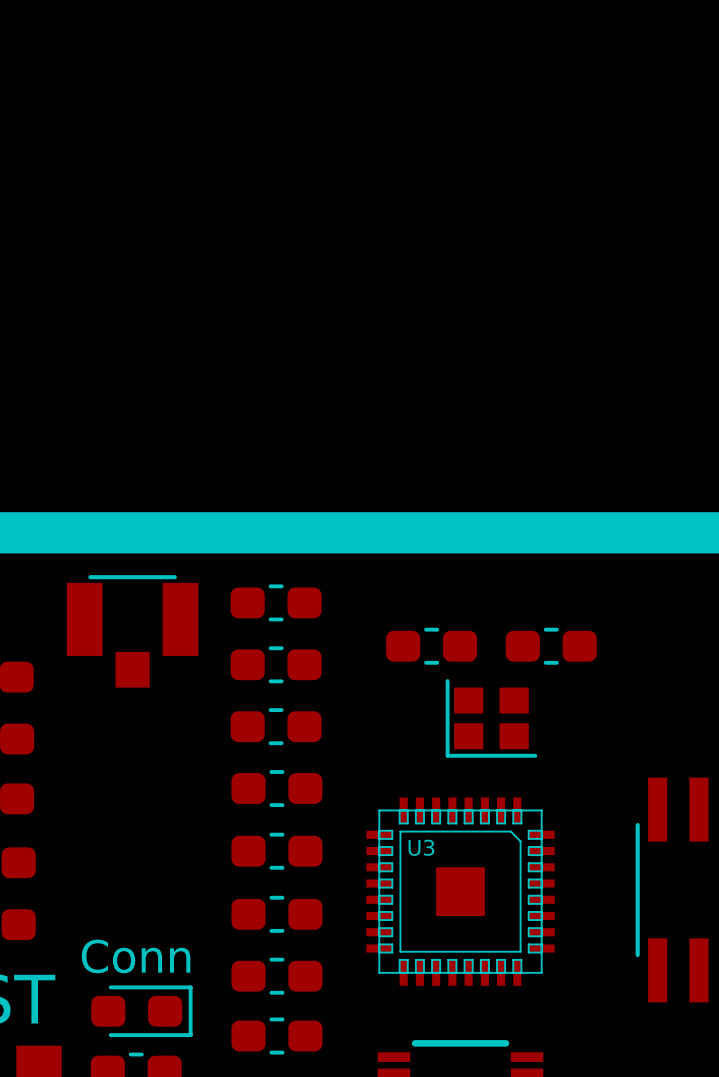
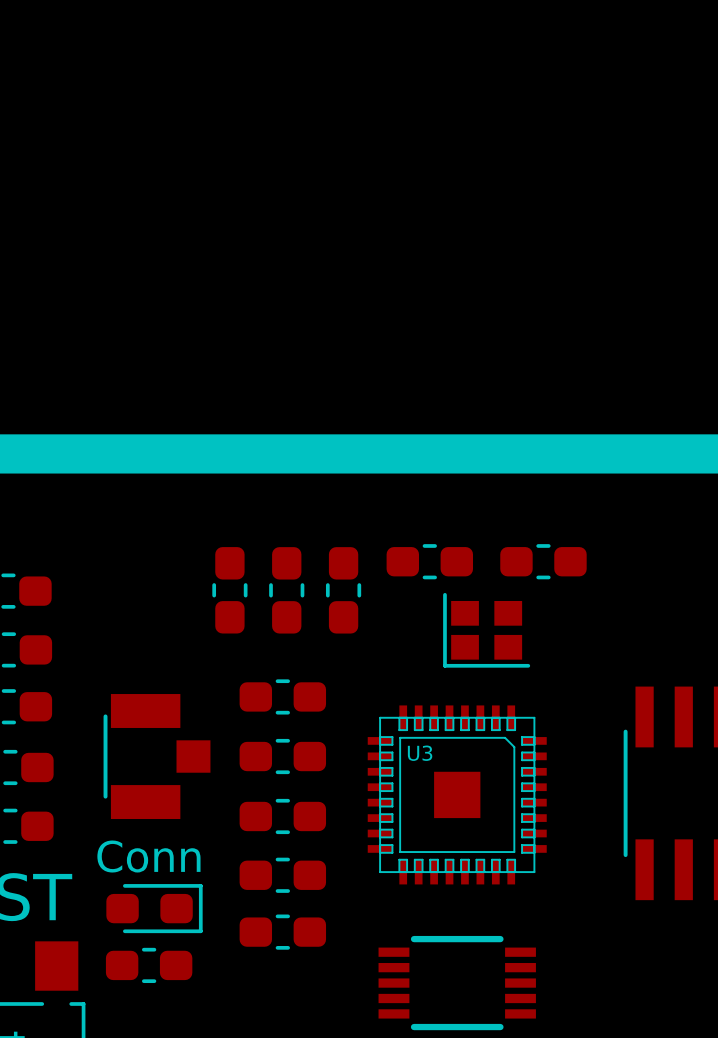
part: (276, 602) -> none
part rotation: 0° (132, 631) -> 90° counterclockwise (157, 756)
part position: (132, 631) -> (157, 756)
part rotation: 0° (276, 664) -> 90° clockwise (286, 590)
part: none -> (229, 590)
part: none -> (343, 590)
part: (276, 726) -> none

